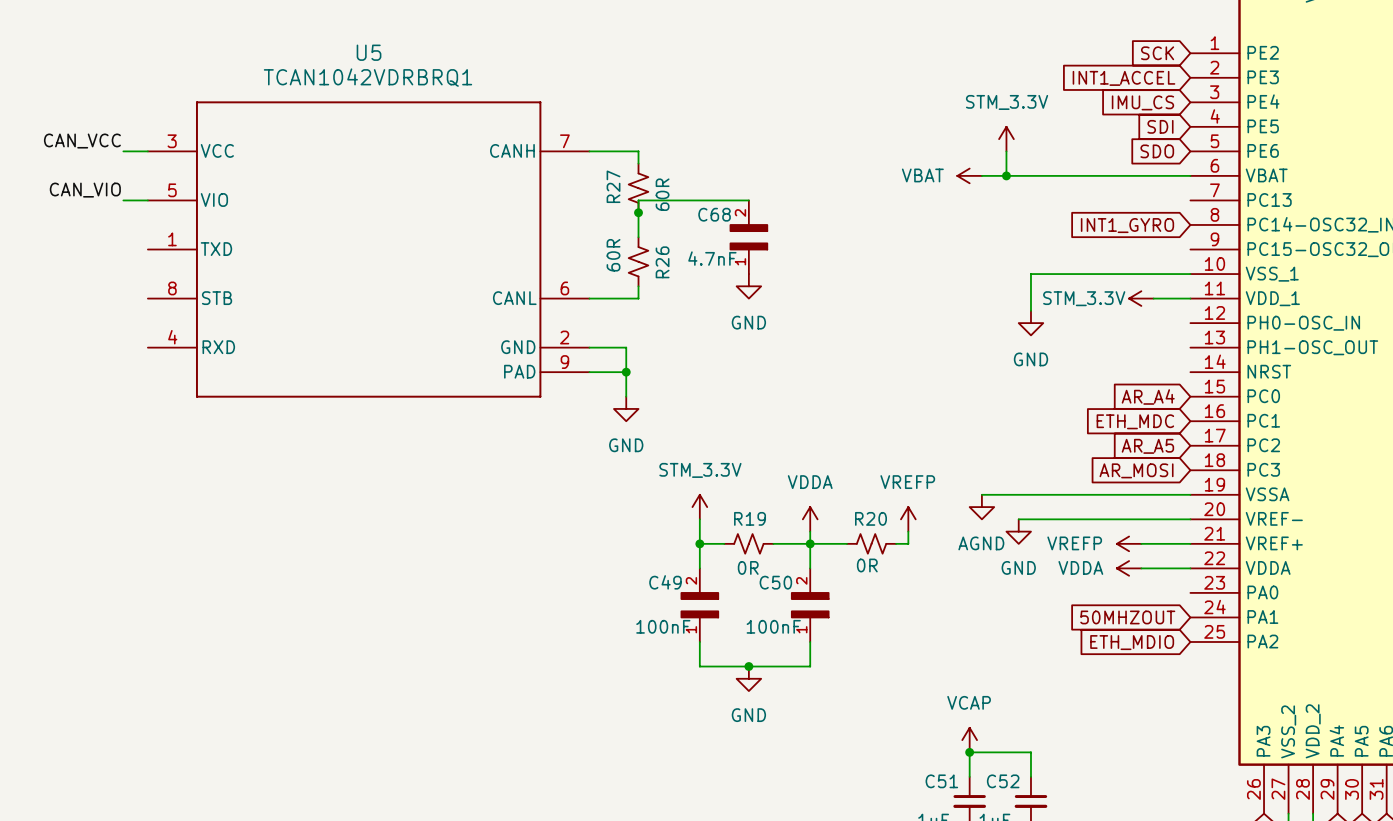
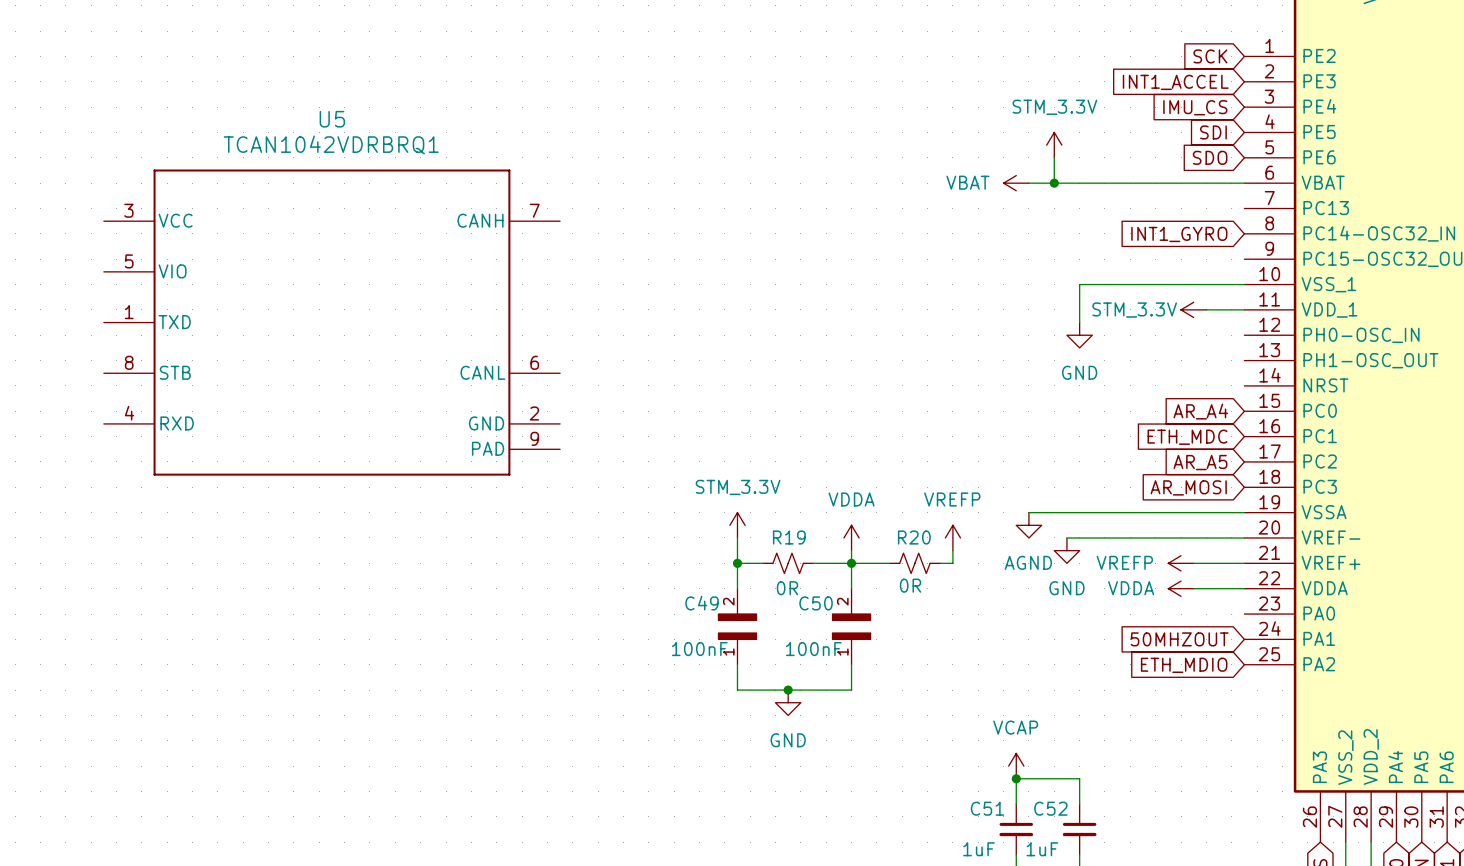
label: CAN_VCC (82, 141) -> none
wire: (123, 151) (147, 151) -> none
wire: (589, 151) (638, 151) (638, 163) -> none
R27: 60R (638, 188) -> none
label: CAN_VIO (85, 190) -> none
wire: (123, 200) (147, 200) -> none
wire: (748, 200) (638, 200) (638, 237) -> none
junction: (638, 212) -> none
C68: 4.7nF (748, 237) -> none
U5 position: (368, 249) -> (331, 322)
R26: 60R (638, 261) -> none
wire: (638, 286) (638, 298) (589, 298) -> none
power symbol: GND (748, 286) -> none
wire: (589, 347) (626, 347) (626, 396) -> none
wire: (589, 372) (626, 372) -> none
junction: (626, 372) -> none
power symbol: GND (626, 408) -> none

